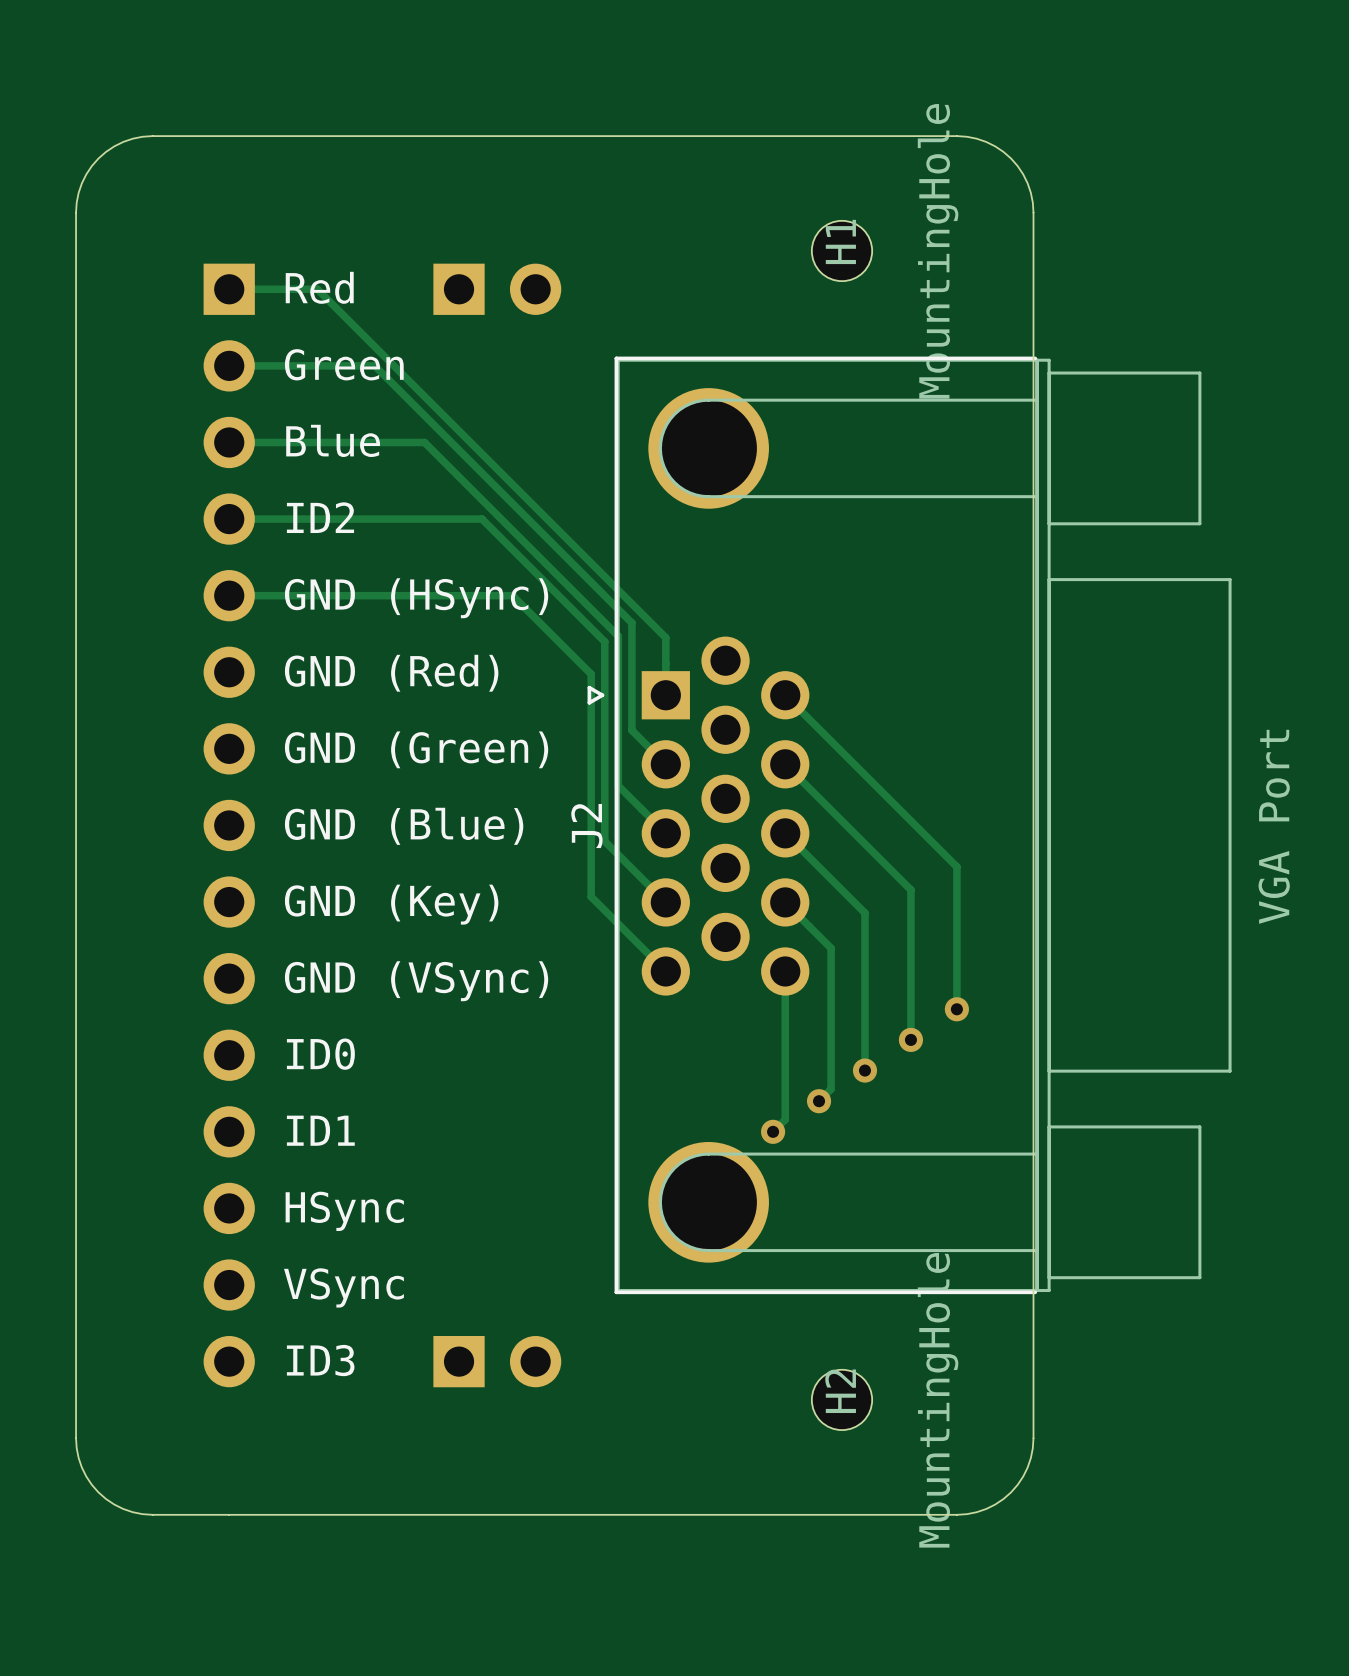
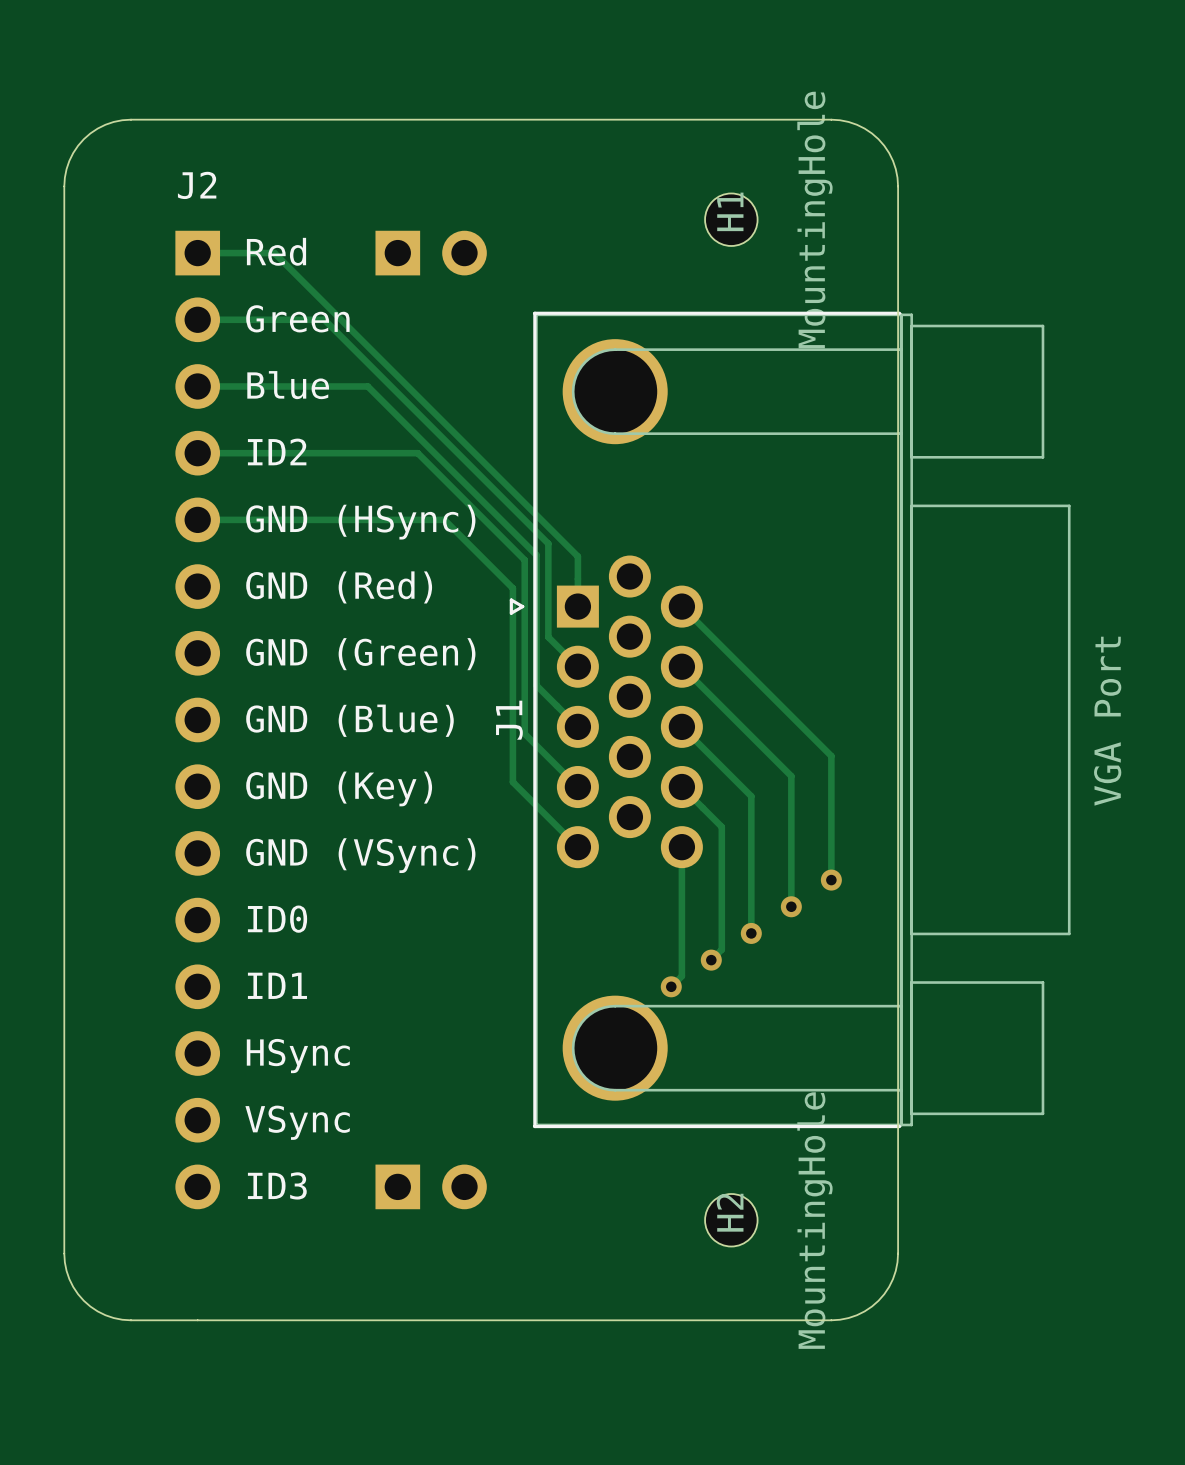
text: none -> J2 (197, 185)
J2 name: J2 (586, 826) -> J1 (509, 720)

